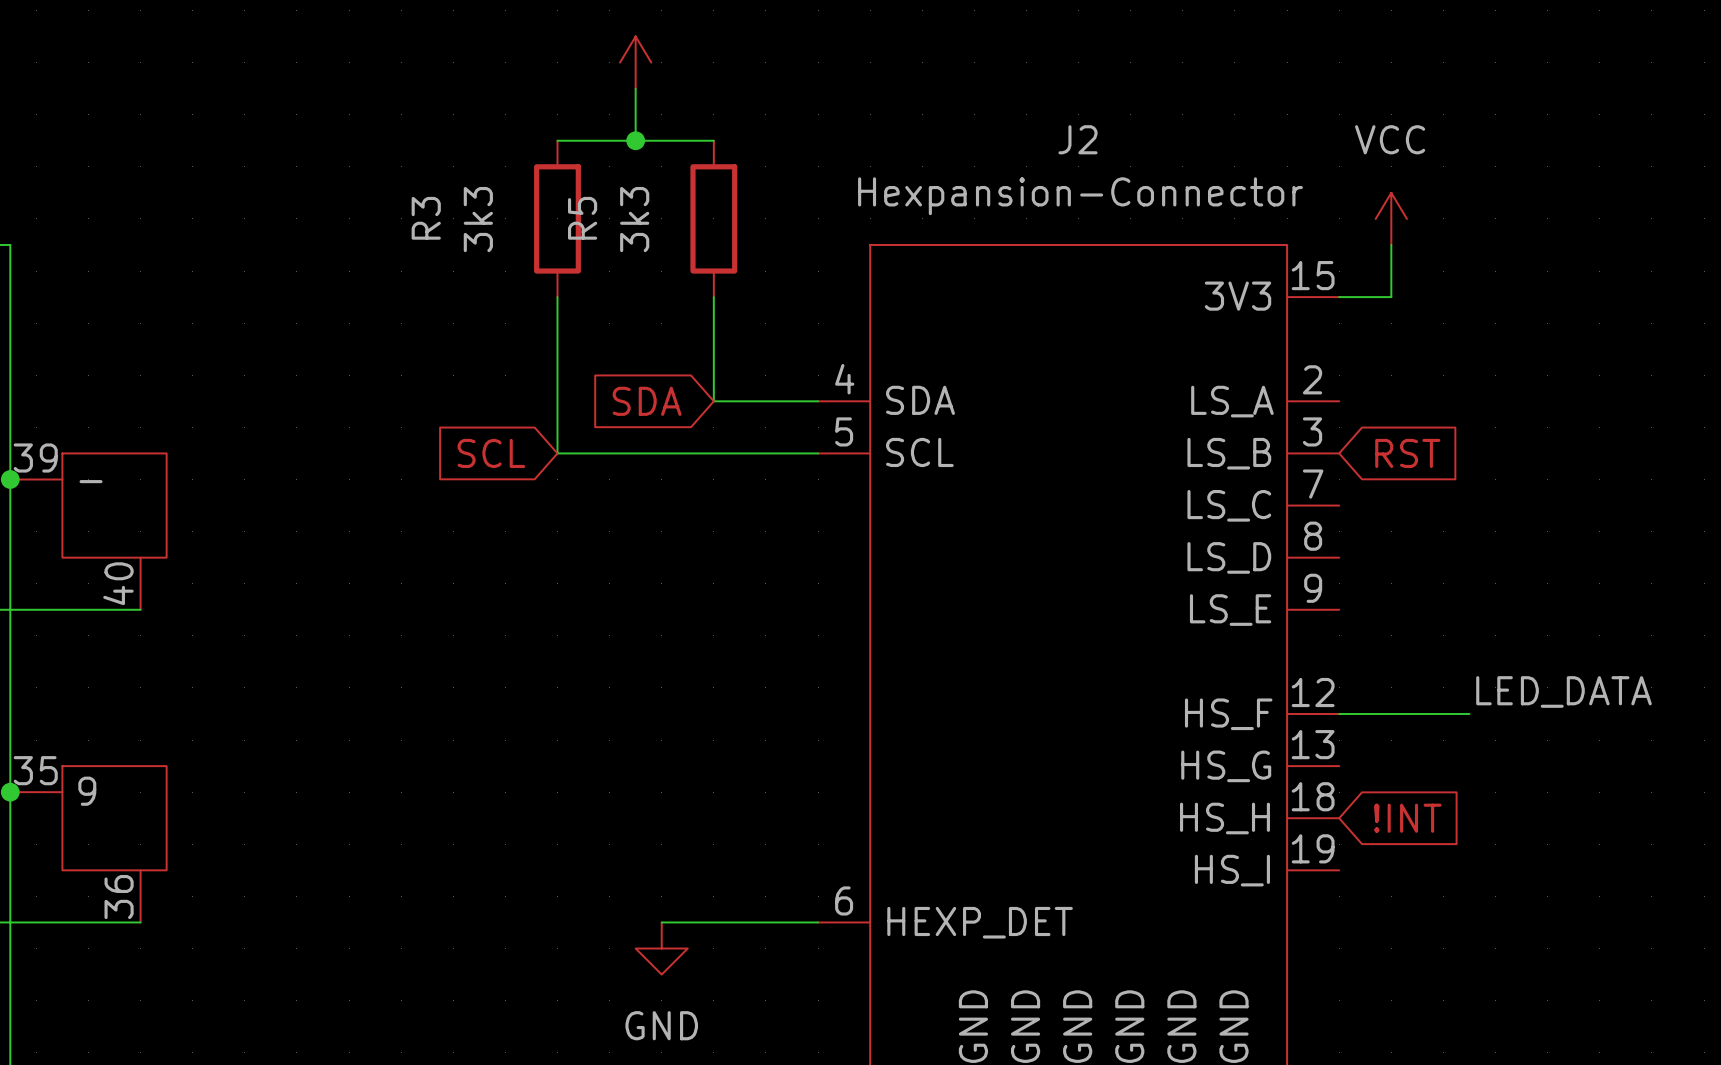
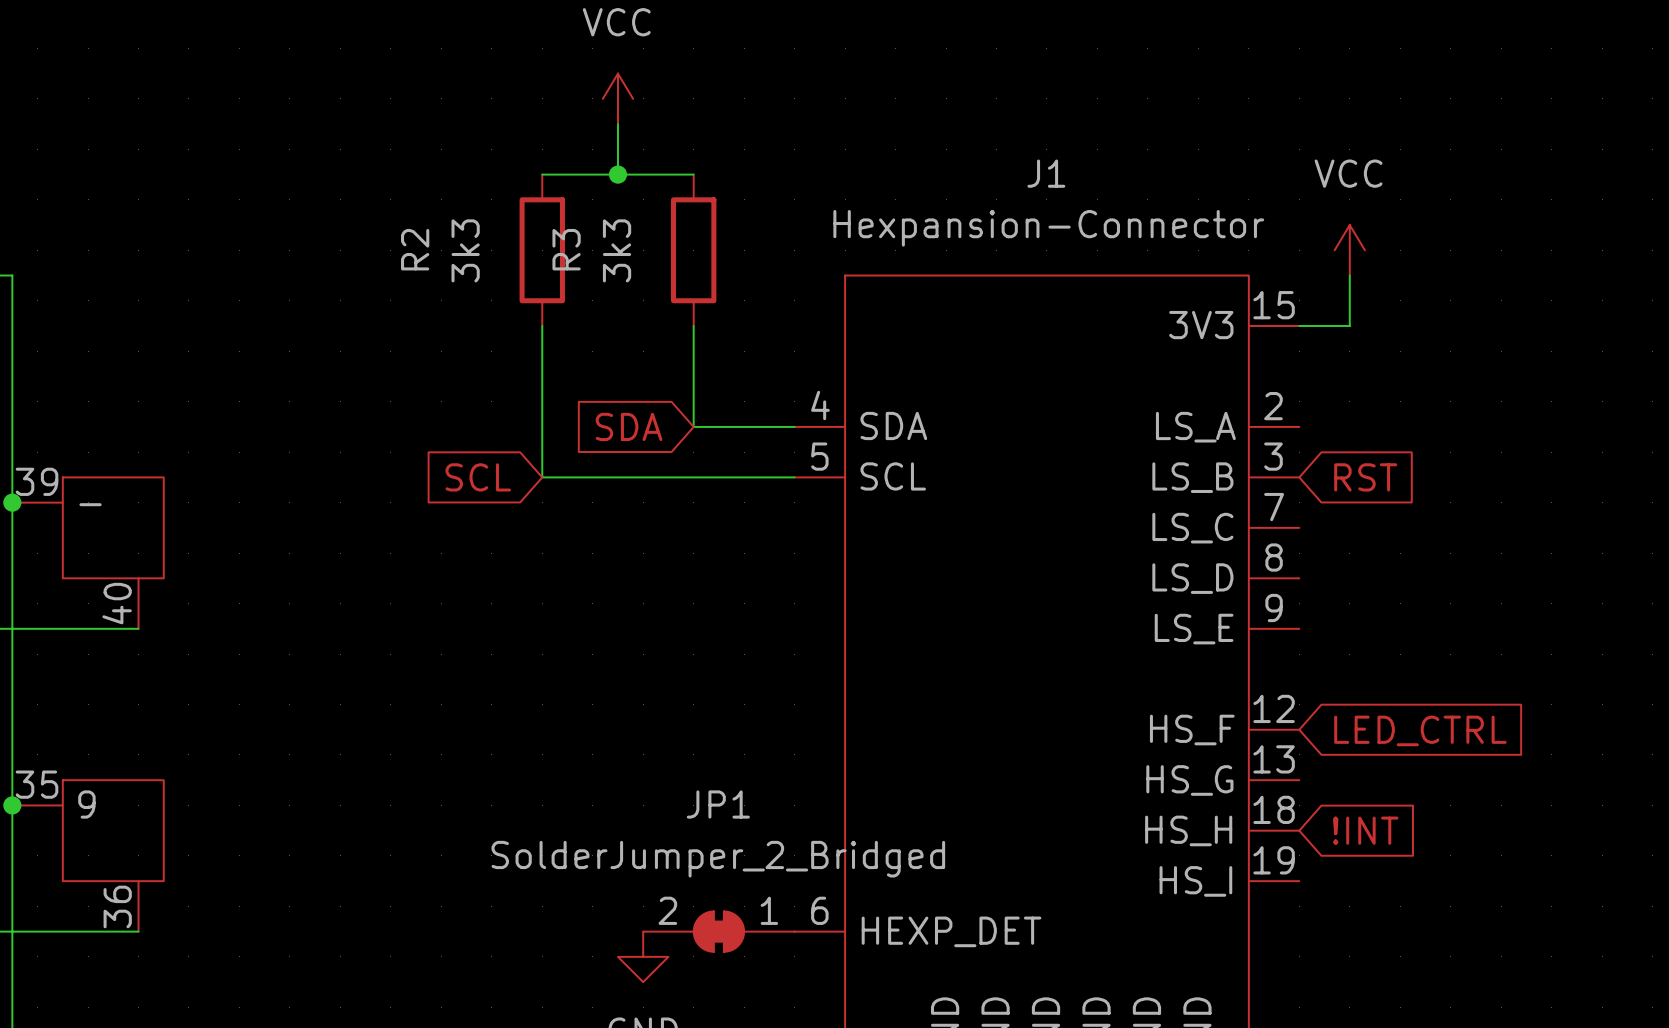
J2 name: J2 (1078, 139) -> J1 (1046, 173)
R3 name: R3 (426, 218) -> R2 (415, 249)
R5 name: R5 (582, 218) -> R3 (566, 249)
label: LED_DATA (1563, 691) -> none
wire: (1339, 714) (1469, 714) -> none
global label: none -> LED_CTRL (1420, 730)
JP1: none -> SolderJumper_2_Bridged (718, 931)

